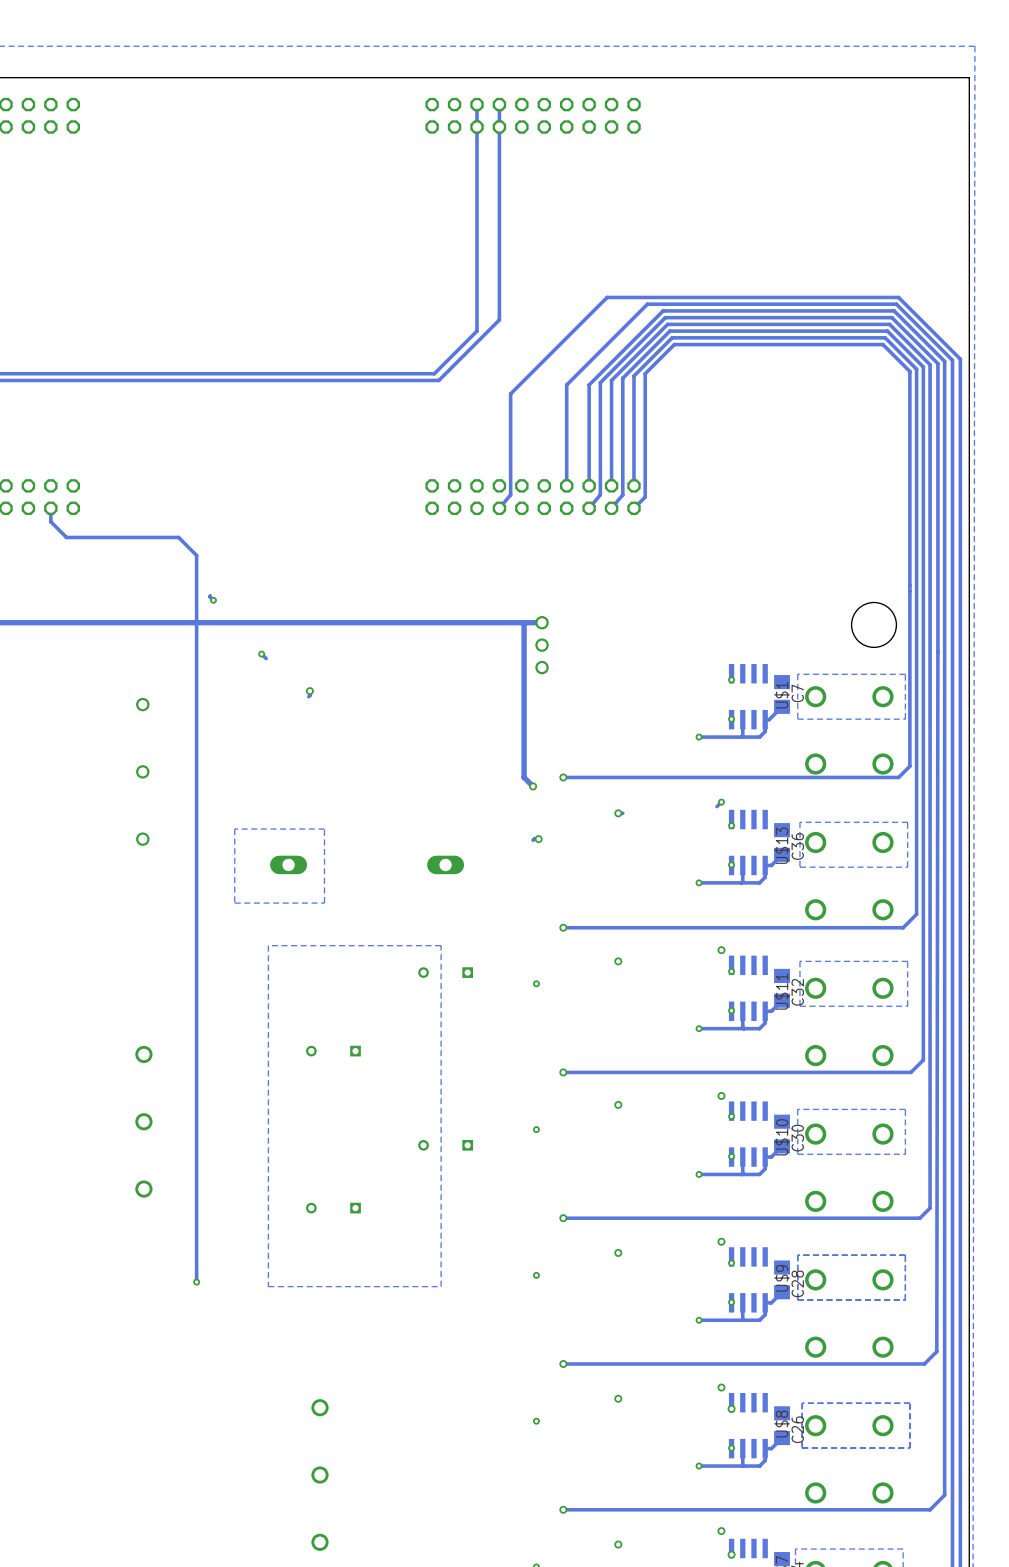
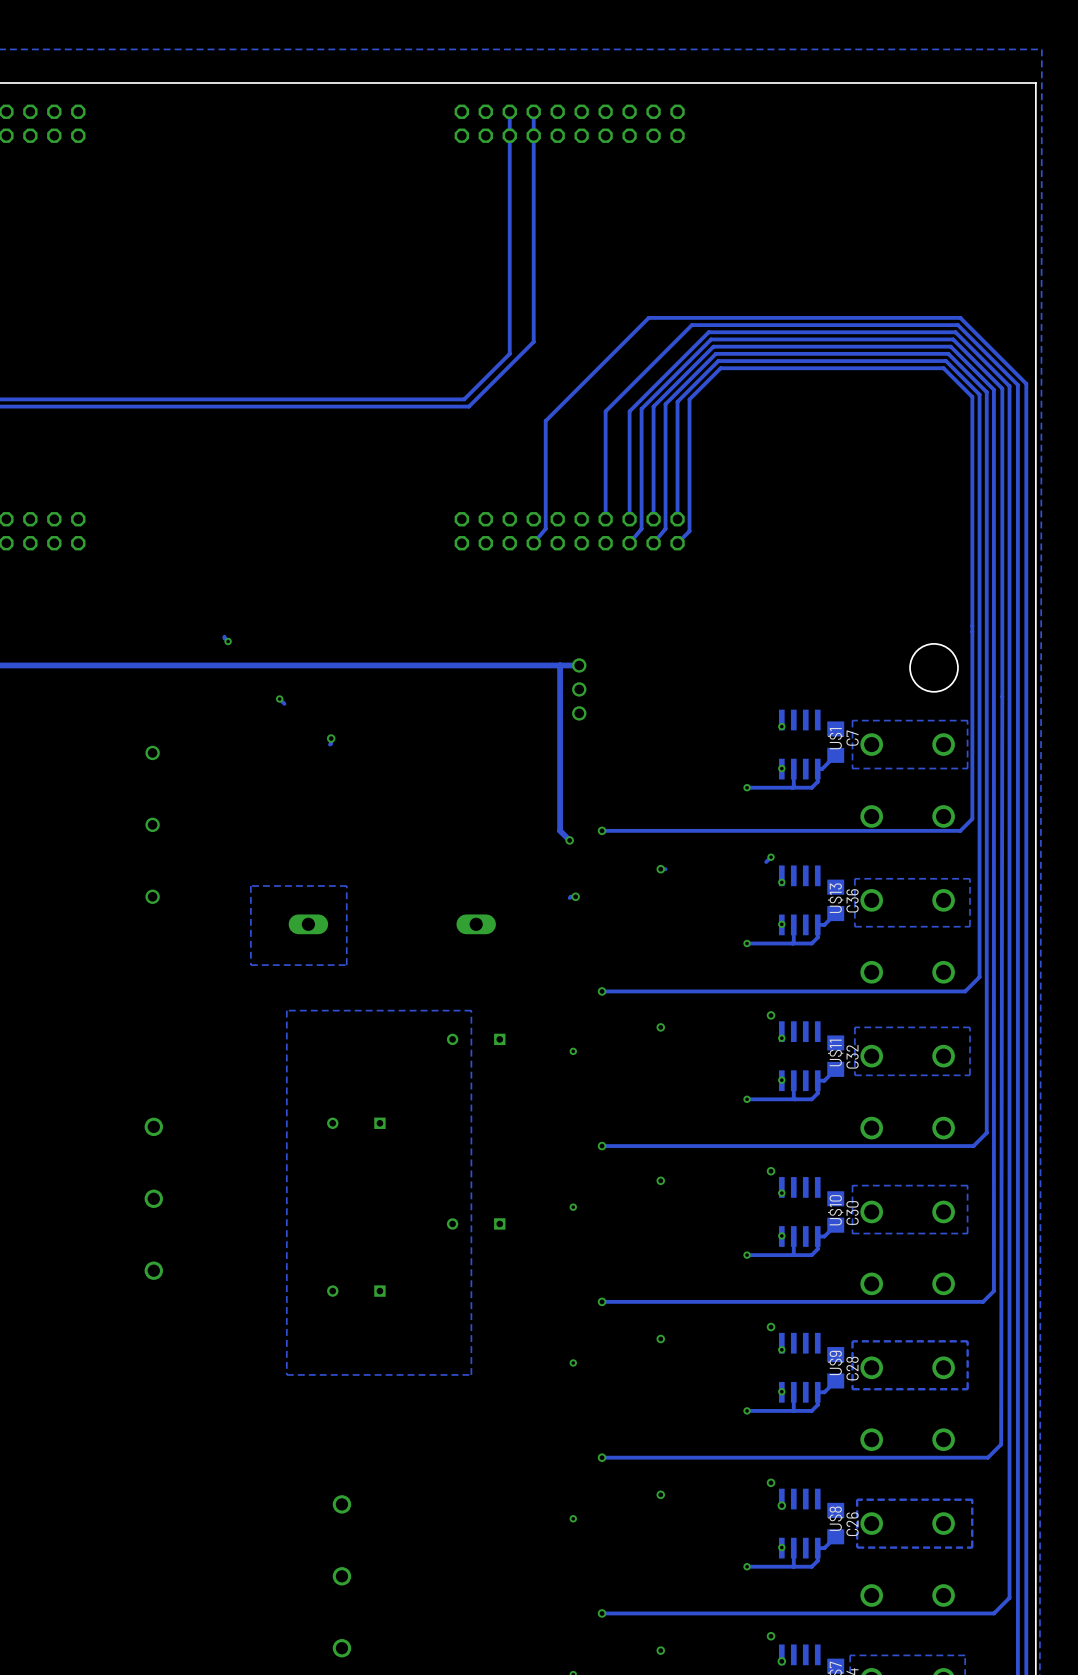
track: (50, 508) (50, 521) (66, 537) (178, 537) (196, 555) (196, 1282) -> none
via: (196, 1282) -> none

